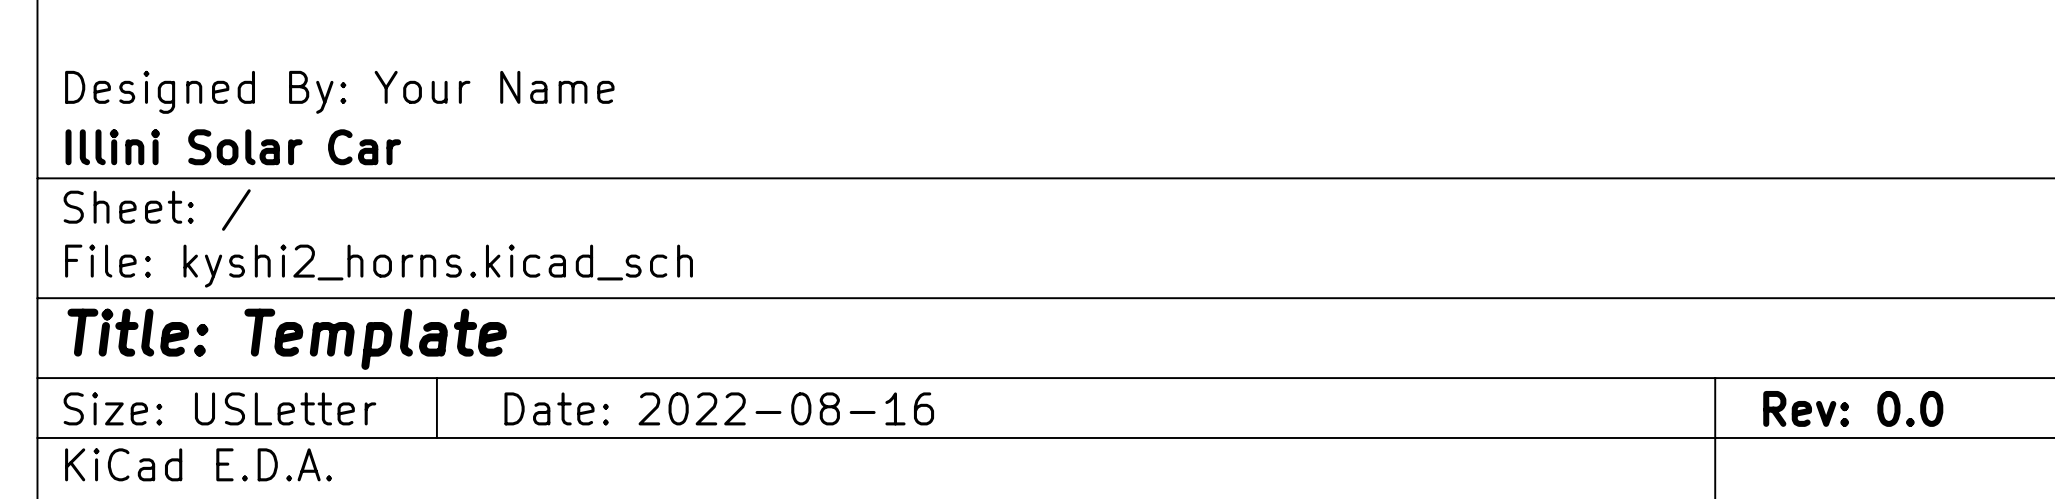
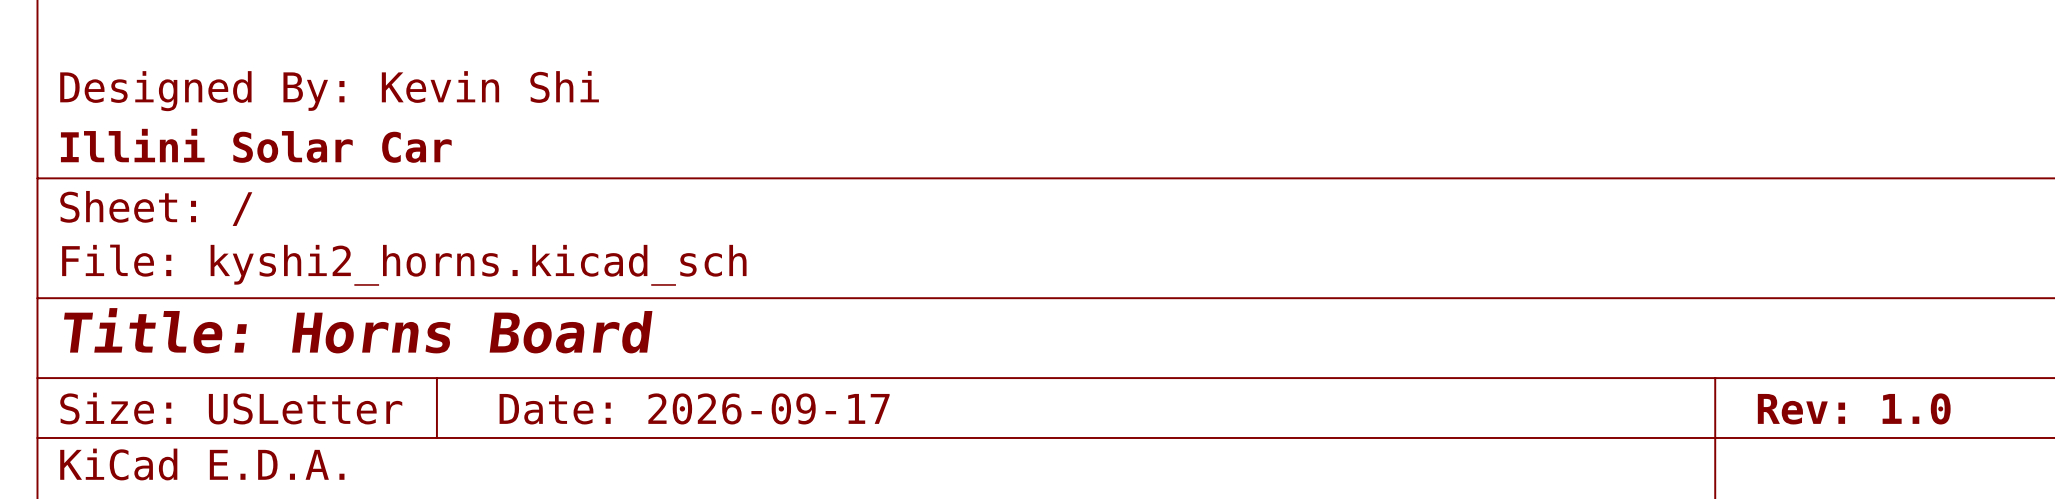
title block: Designed By: Your Name (339, 92) -> Designed By: Kevin Shi (329, 91)
title block: Title: Template (287, 339) -> Title: Horns Board (358, 330)
title block: Date: 2022-08-16 (719, 408) -> Date: 2026-09-17 (694, 408)
title block: Rev: 0.0 (1853, 408) -> Rev: 1.0 (1854, 408)

